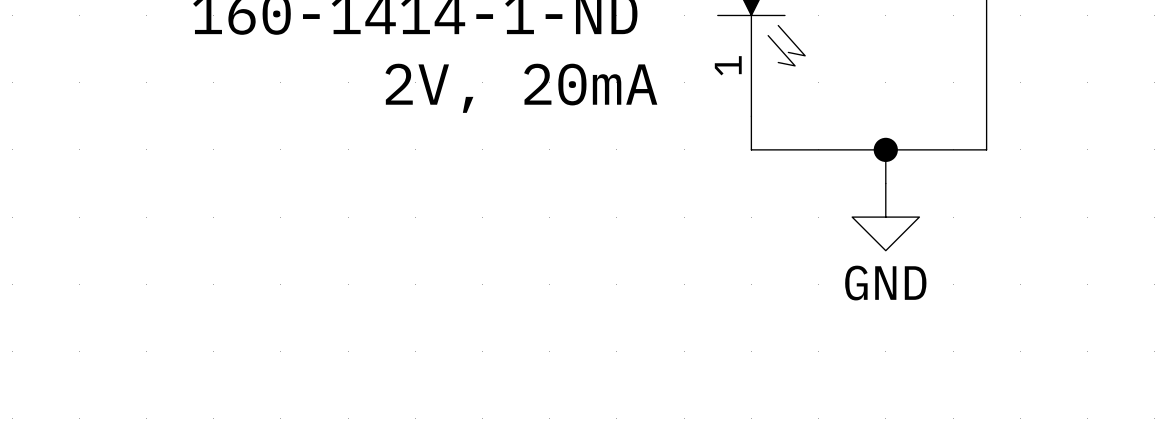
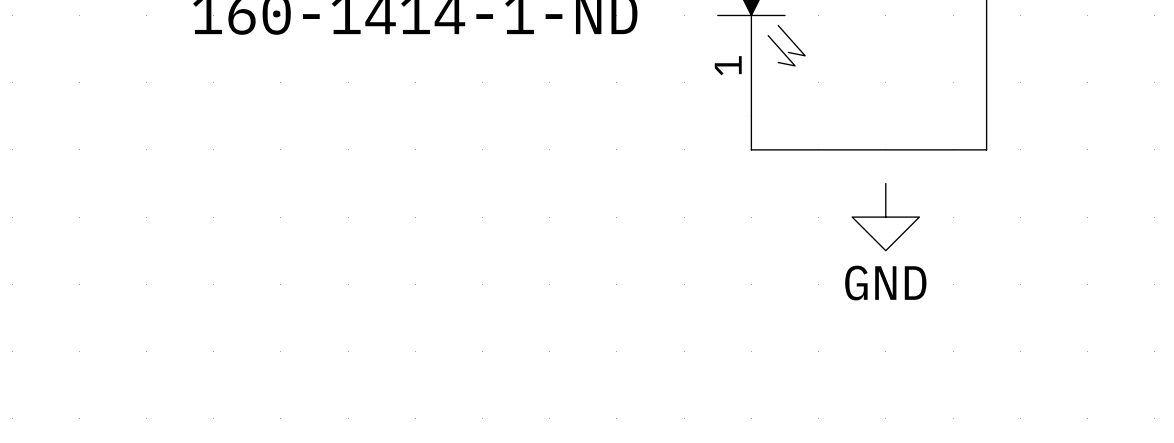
text: 2V, 20mA (521, 88) -> none
wire: (885, 149) (885, 183) -> none
junction: (885, 149) -> none

